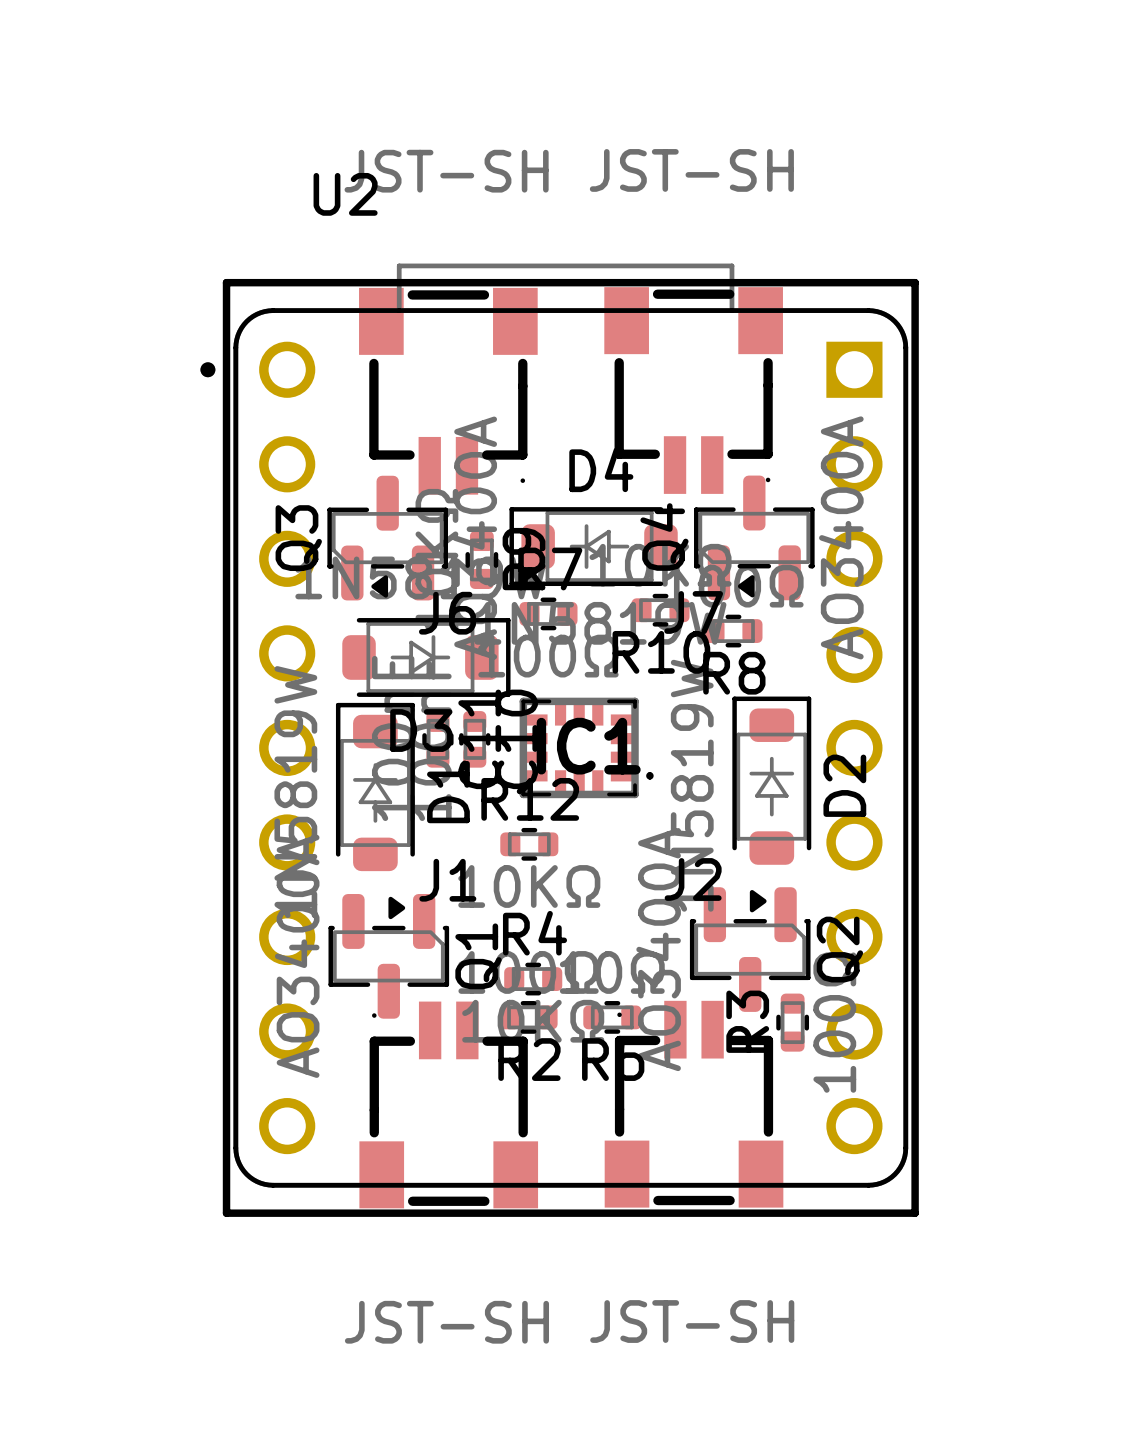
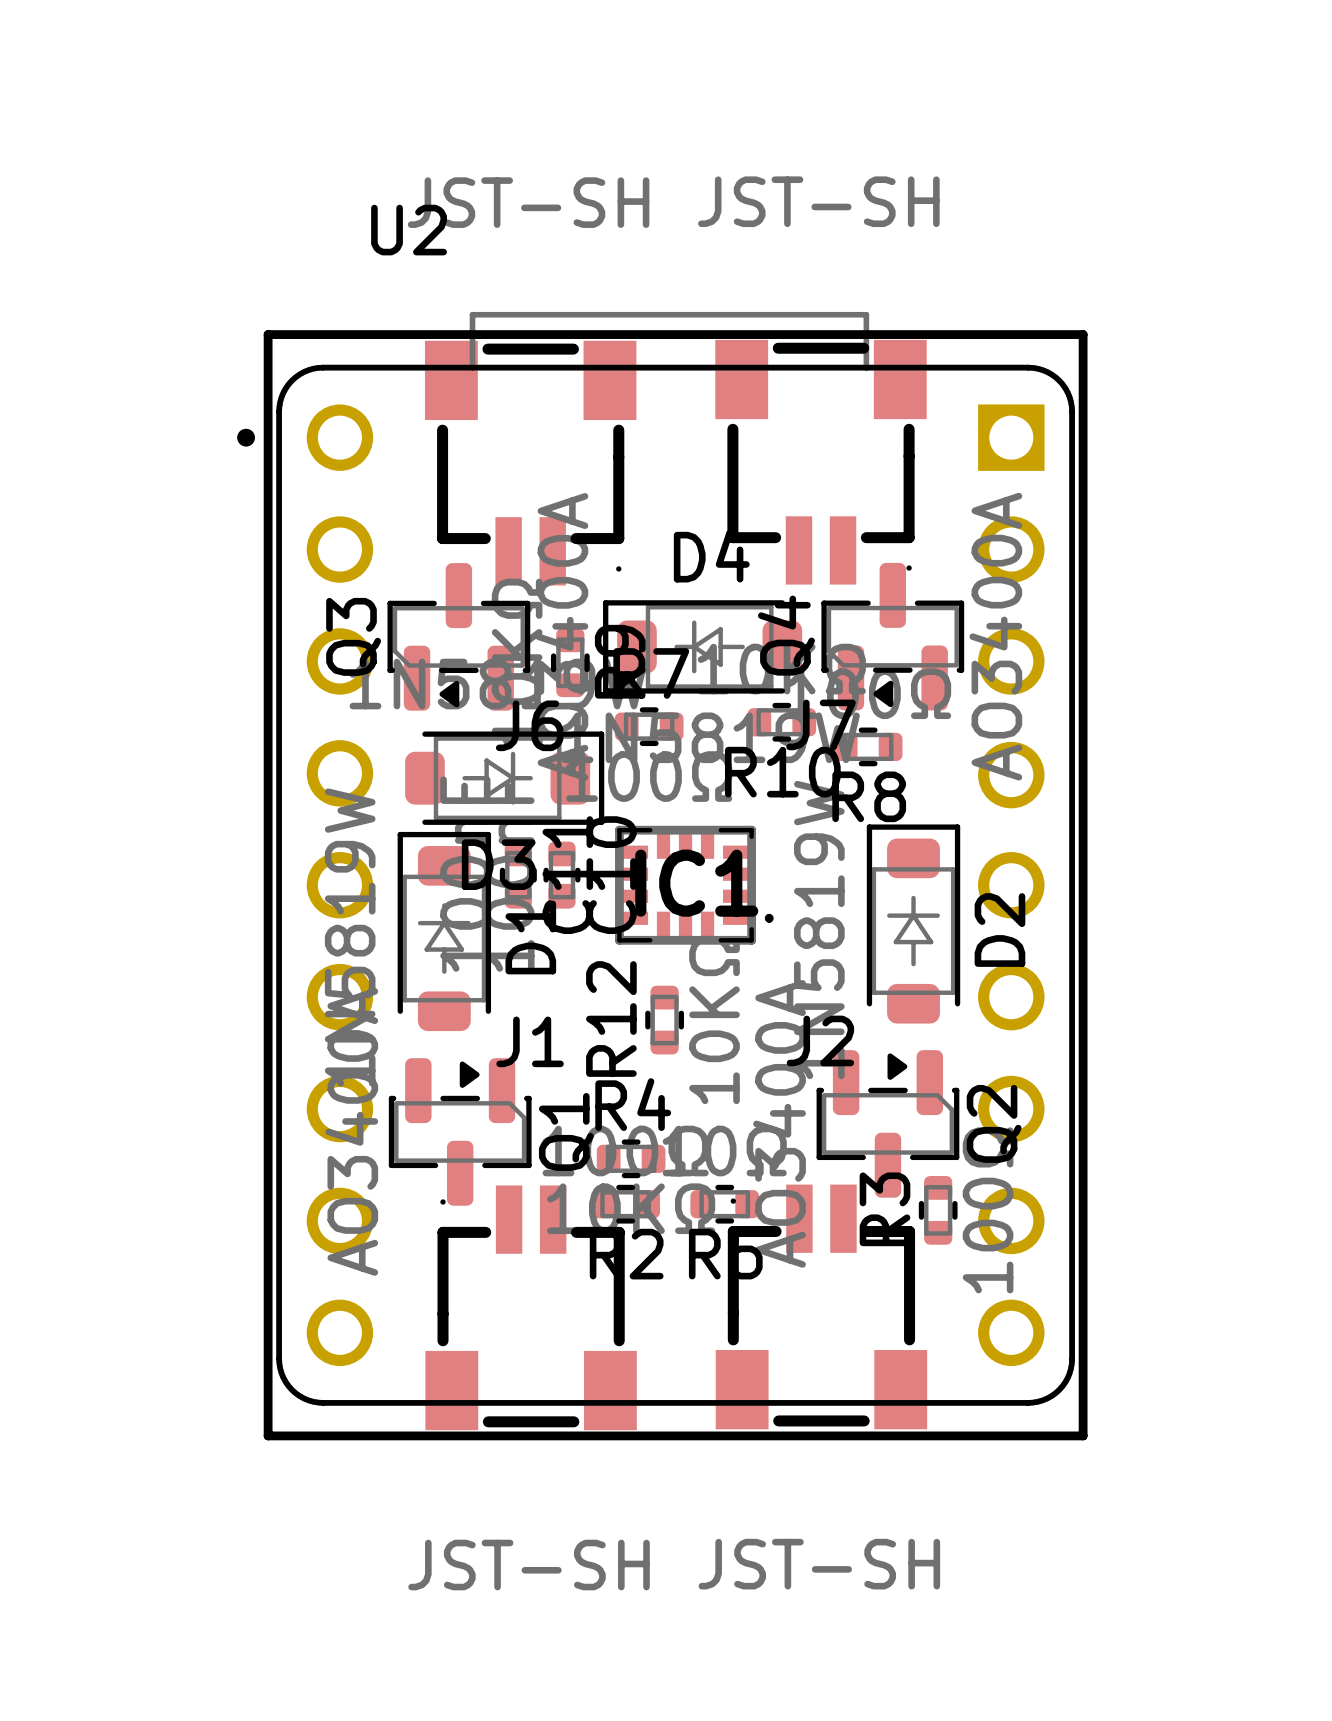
R12 rotation: 0° (529, 844) -> 90° clockwise (664, 1020)
R12 position: (529, 844) -> (664, 1020)

